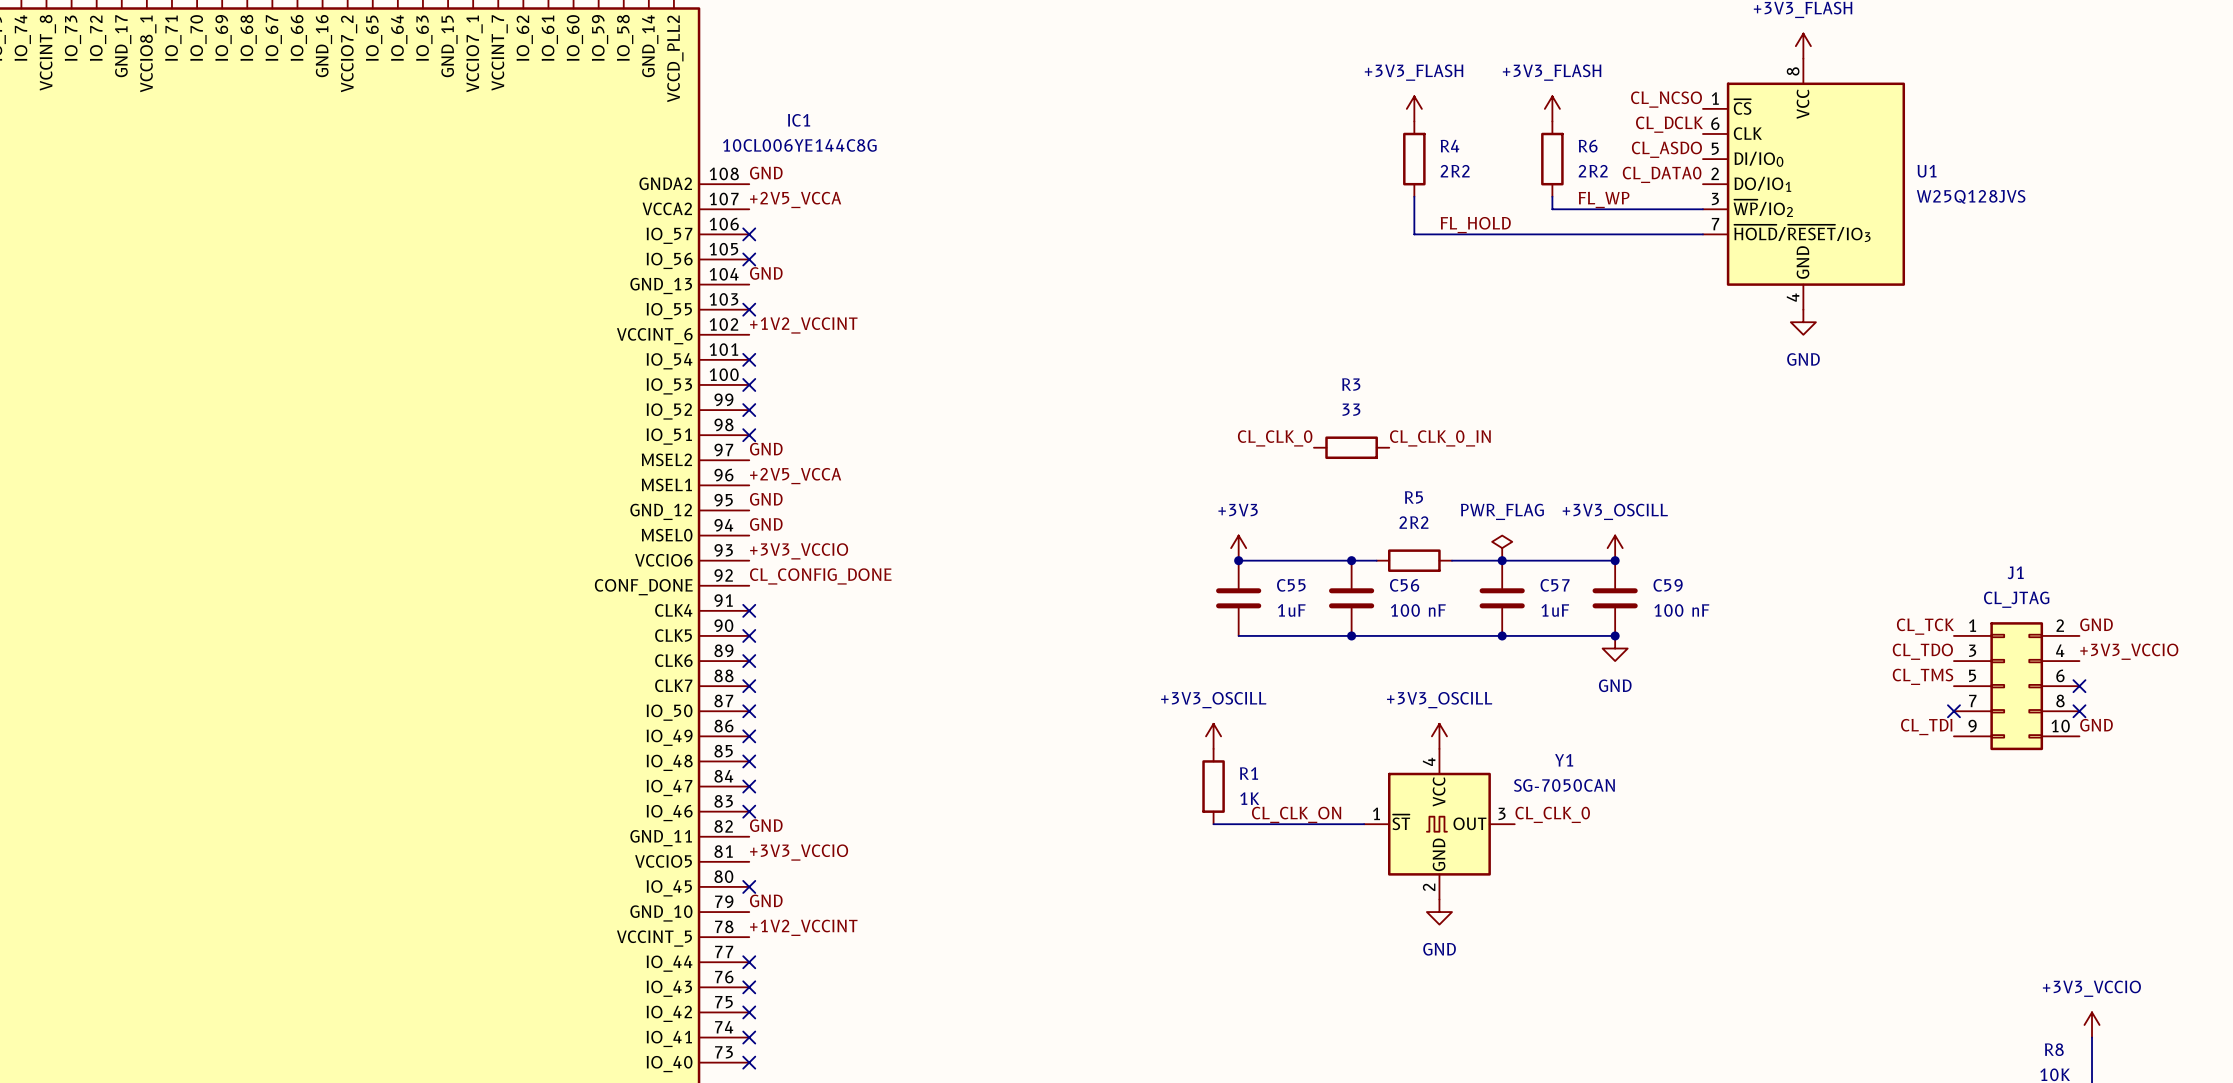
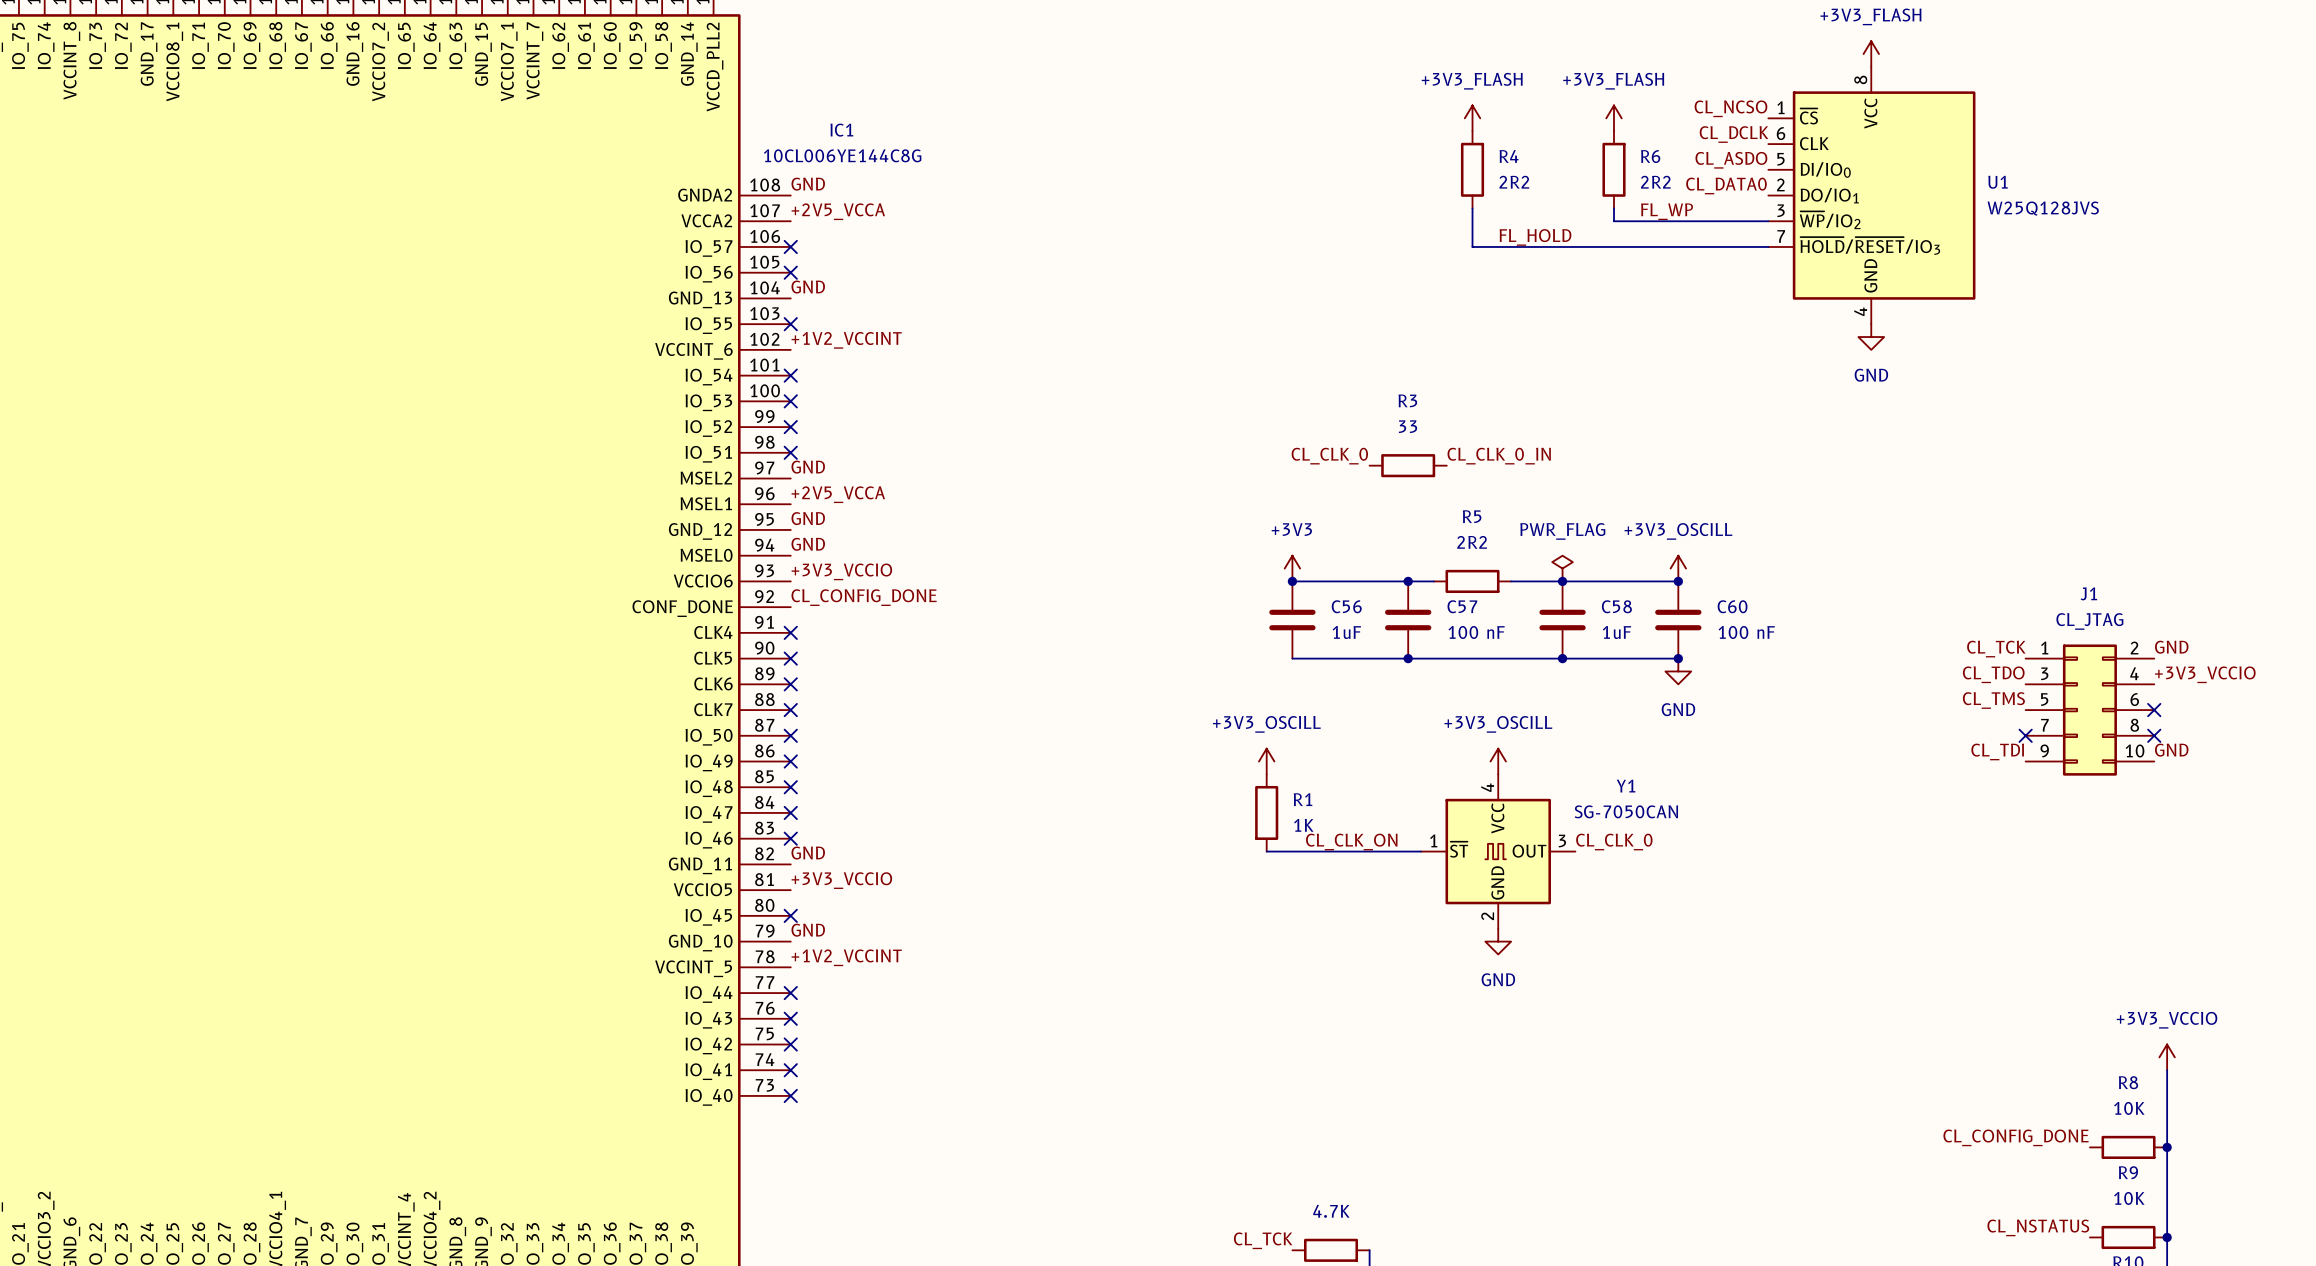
C55 name: C55 (1291, 585) -> C56 (1346, 606)
C56 name: C56 (1404, 585) -> C57 (1462, 606)
C57 name: C57 (1555, 585) -> C58 (1616, 606)
C59 name: C59 (1668, 585) -> C60 (1732, 606)

